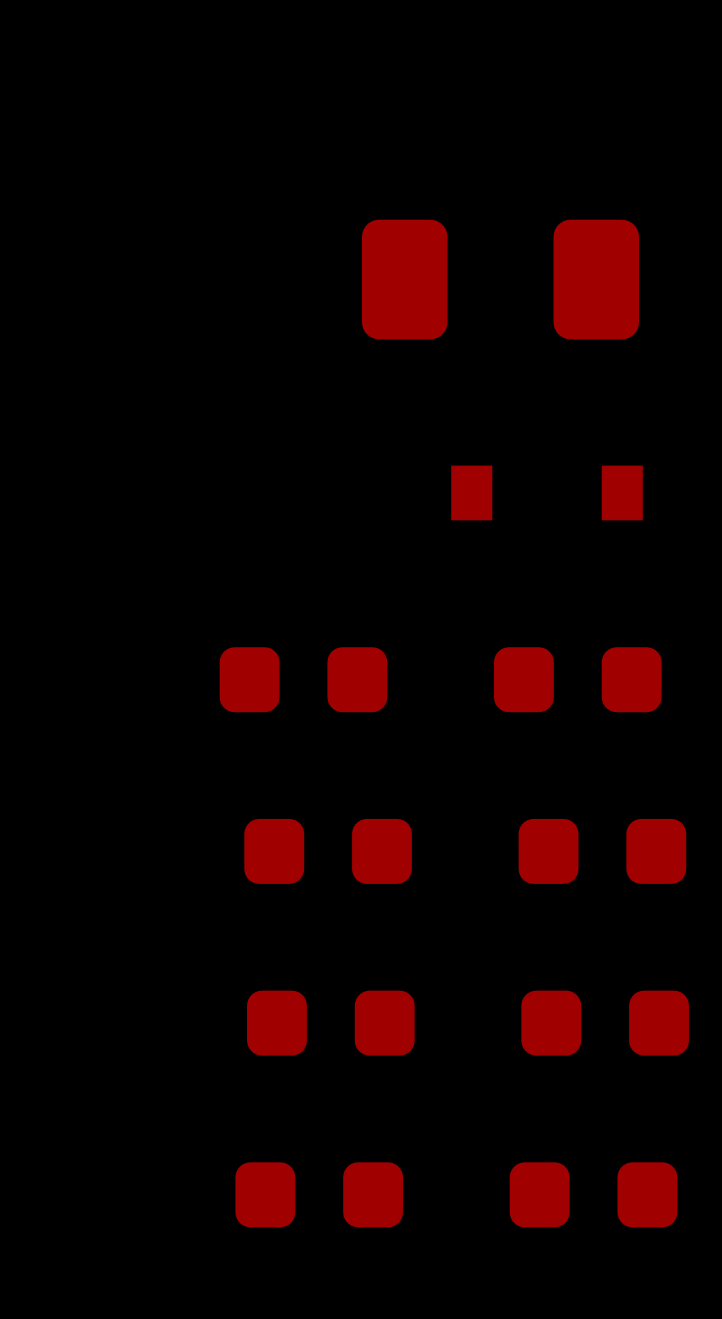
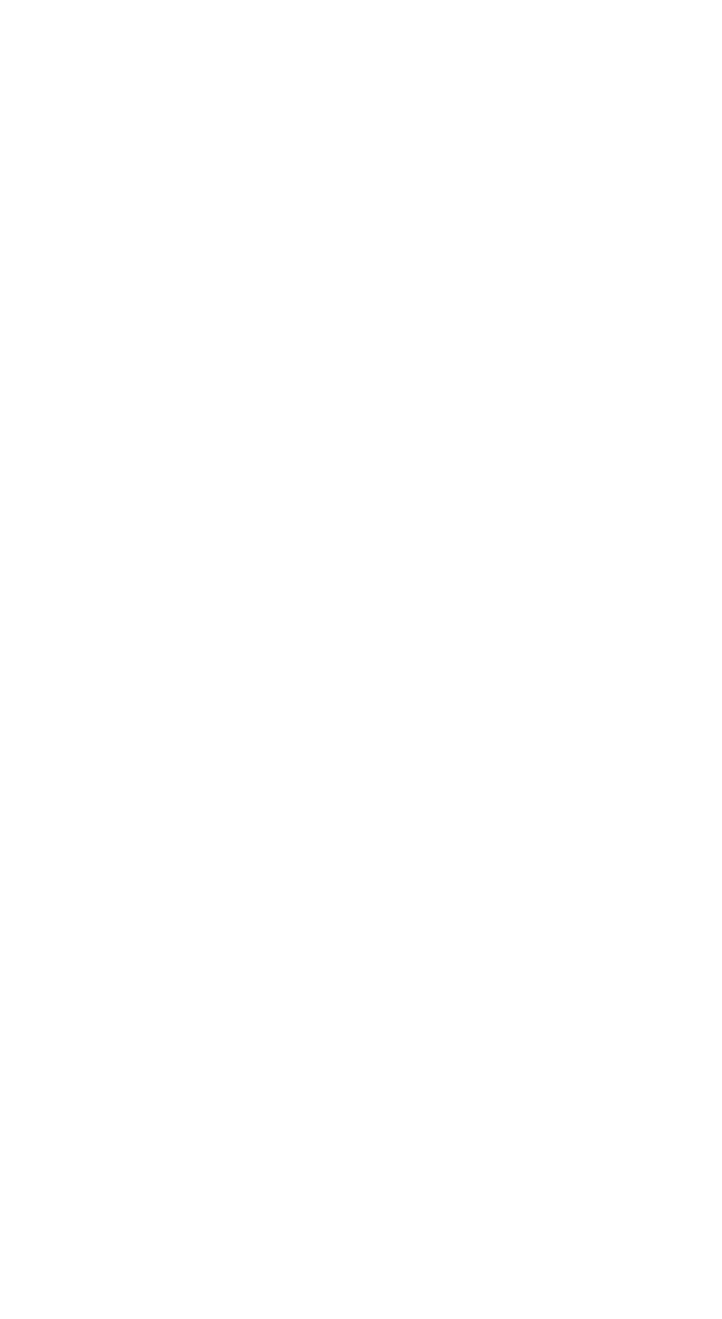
part: (500, 279) -> none
part: (547, 492) -> none
part: (303, 679) -> none
part: (577, 679) -> none
part: (328, 851) -> none
part: (602, 851) -> none
part: (330, 1023) -> none
part: (605, 1023) -> none
part: (319, 1194) -> none
part: (593, 1194) -> none

